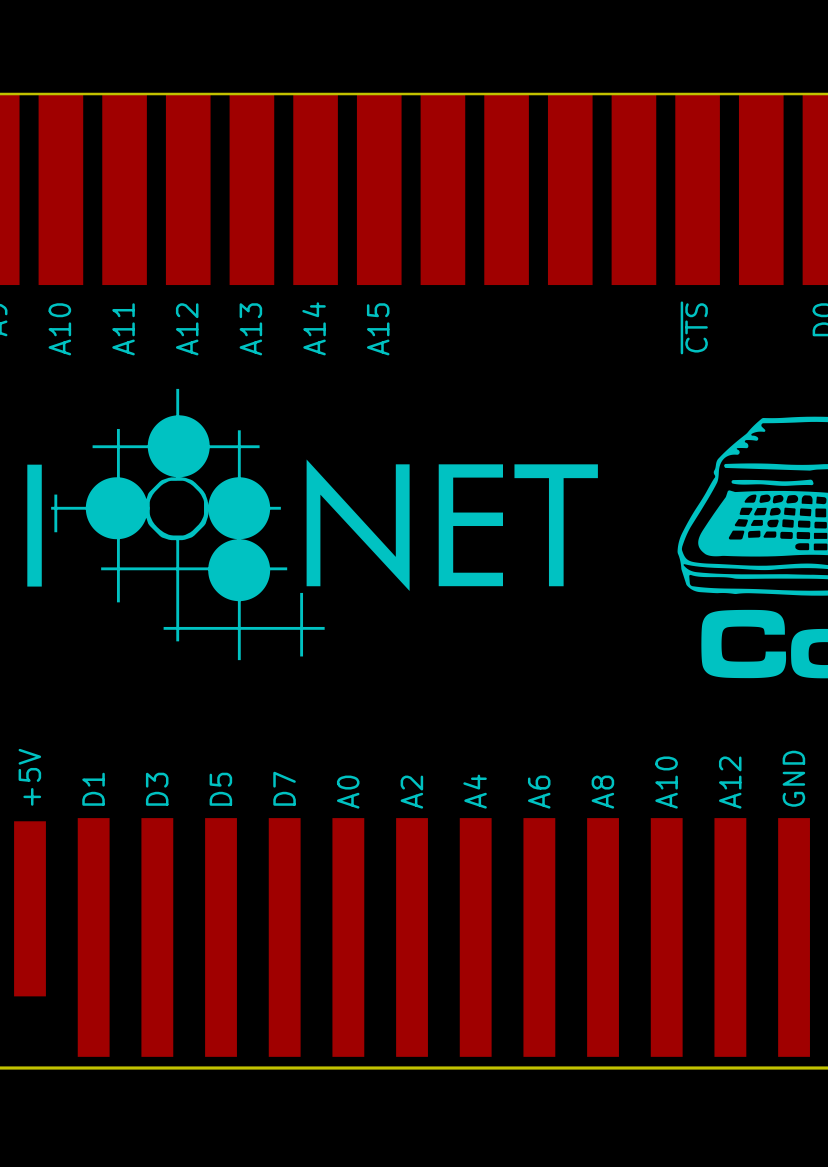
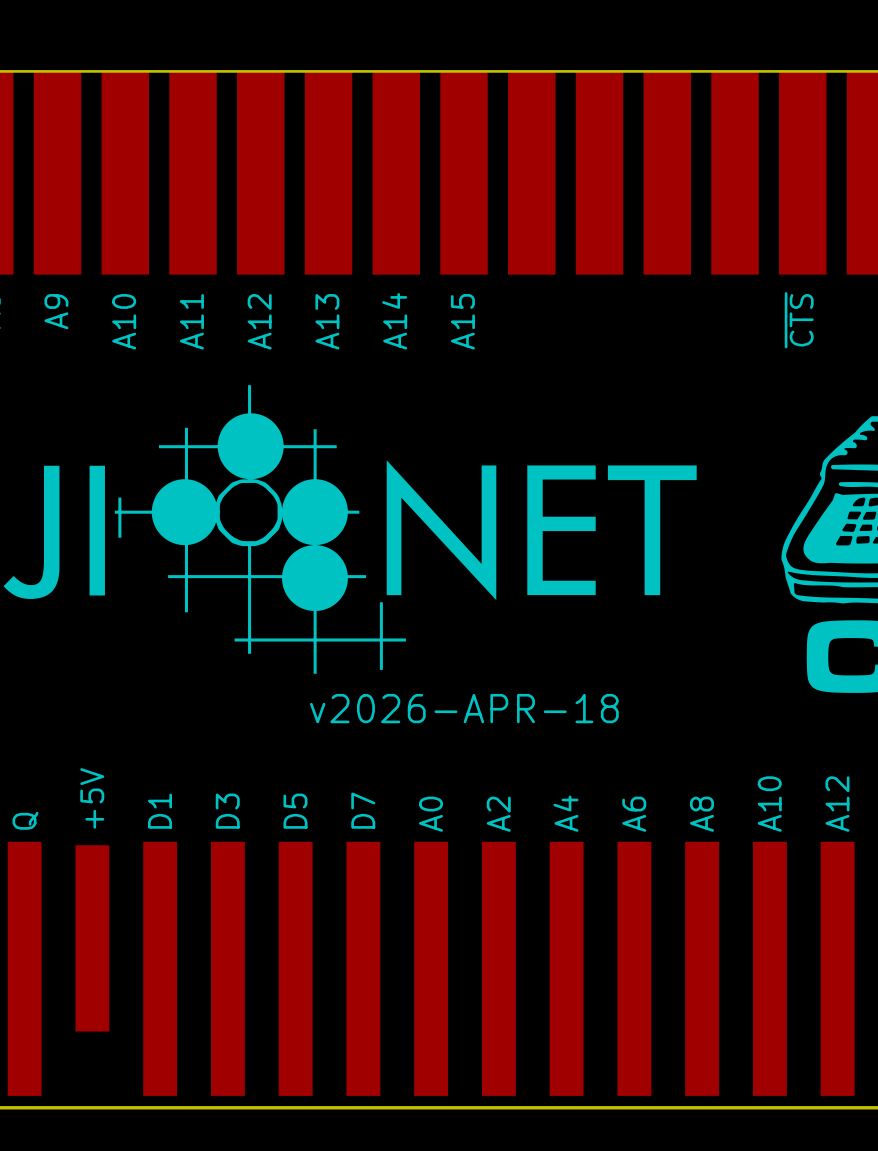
text: none -> v2026-APR-18 (464, 708)

